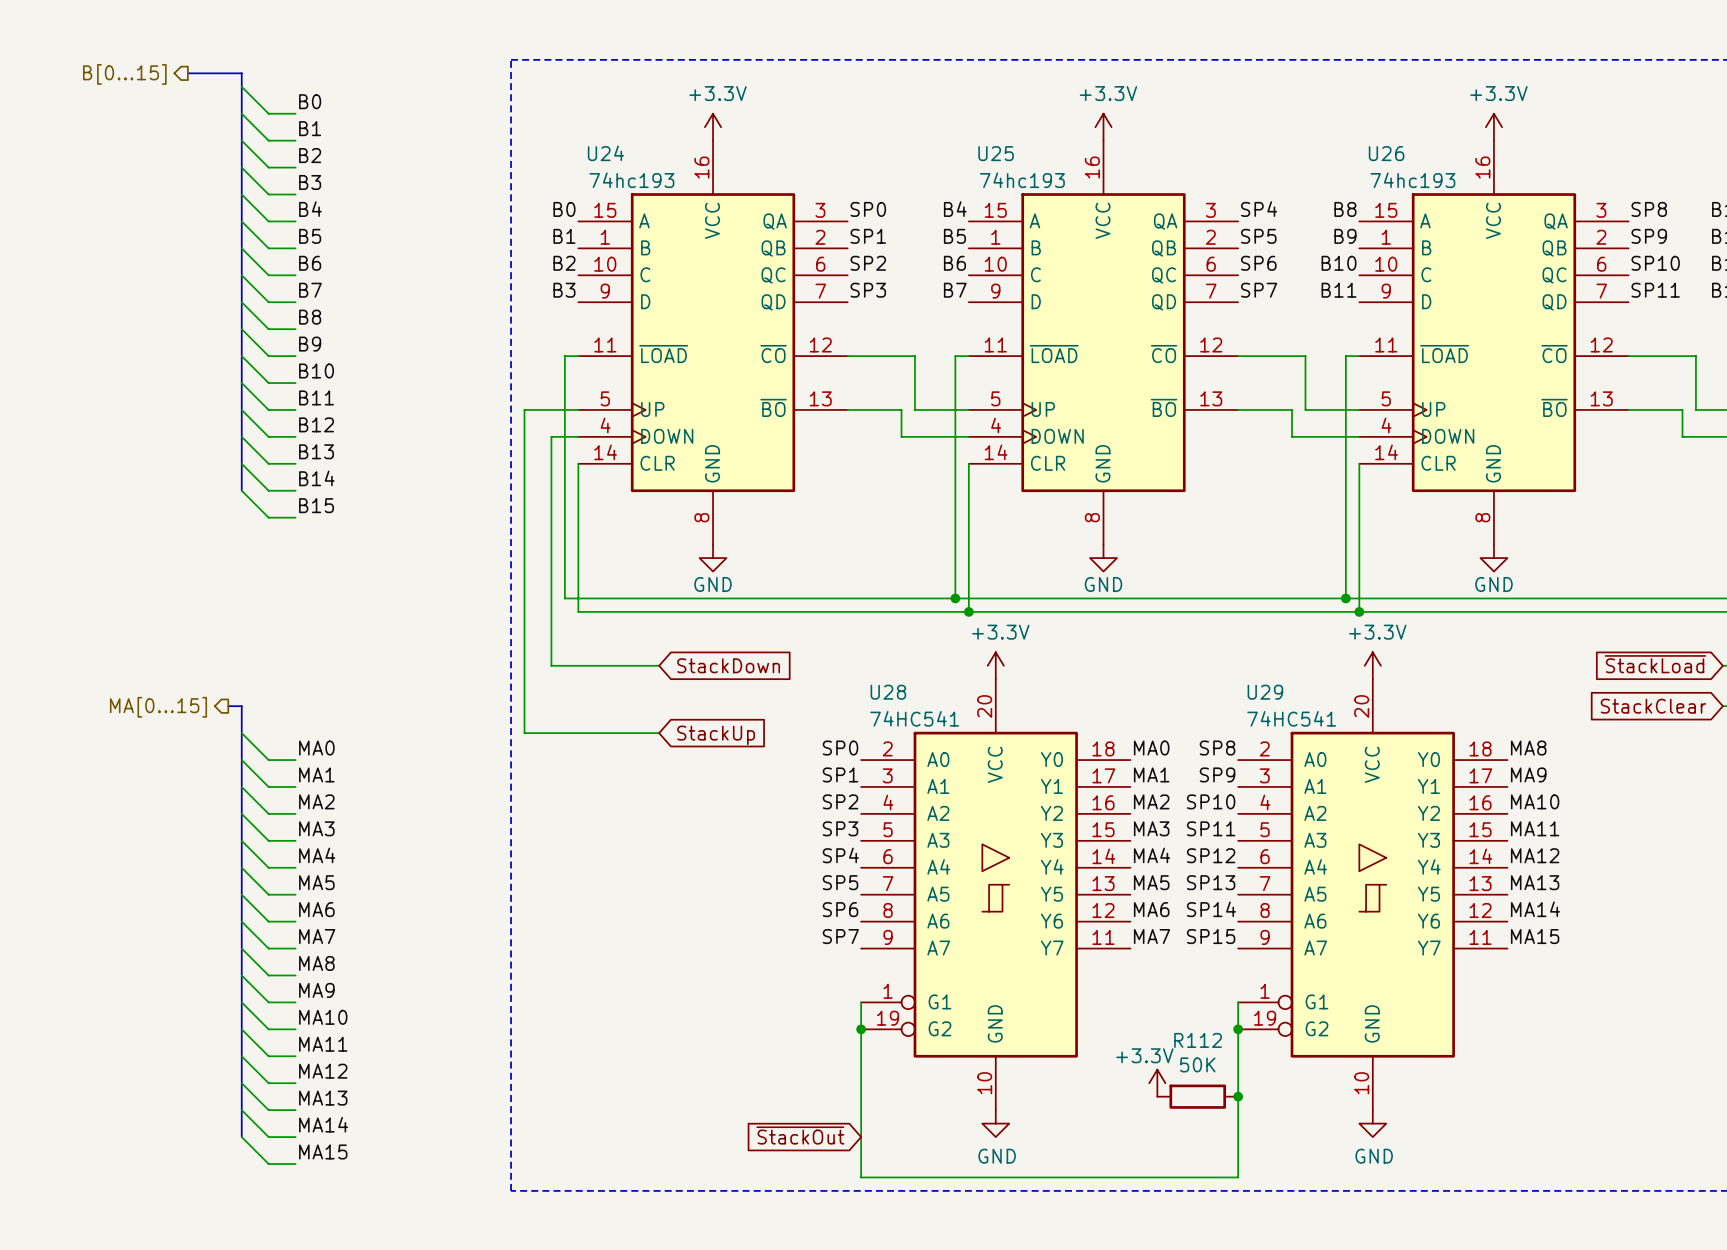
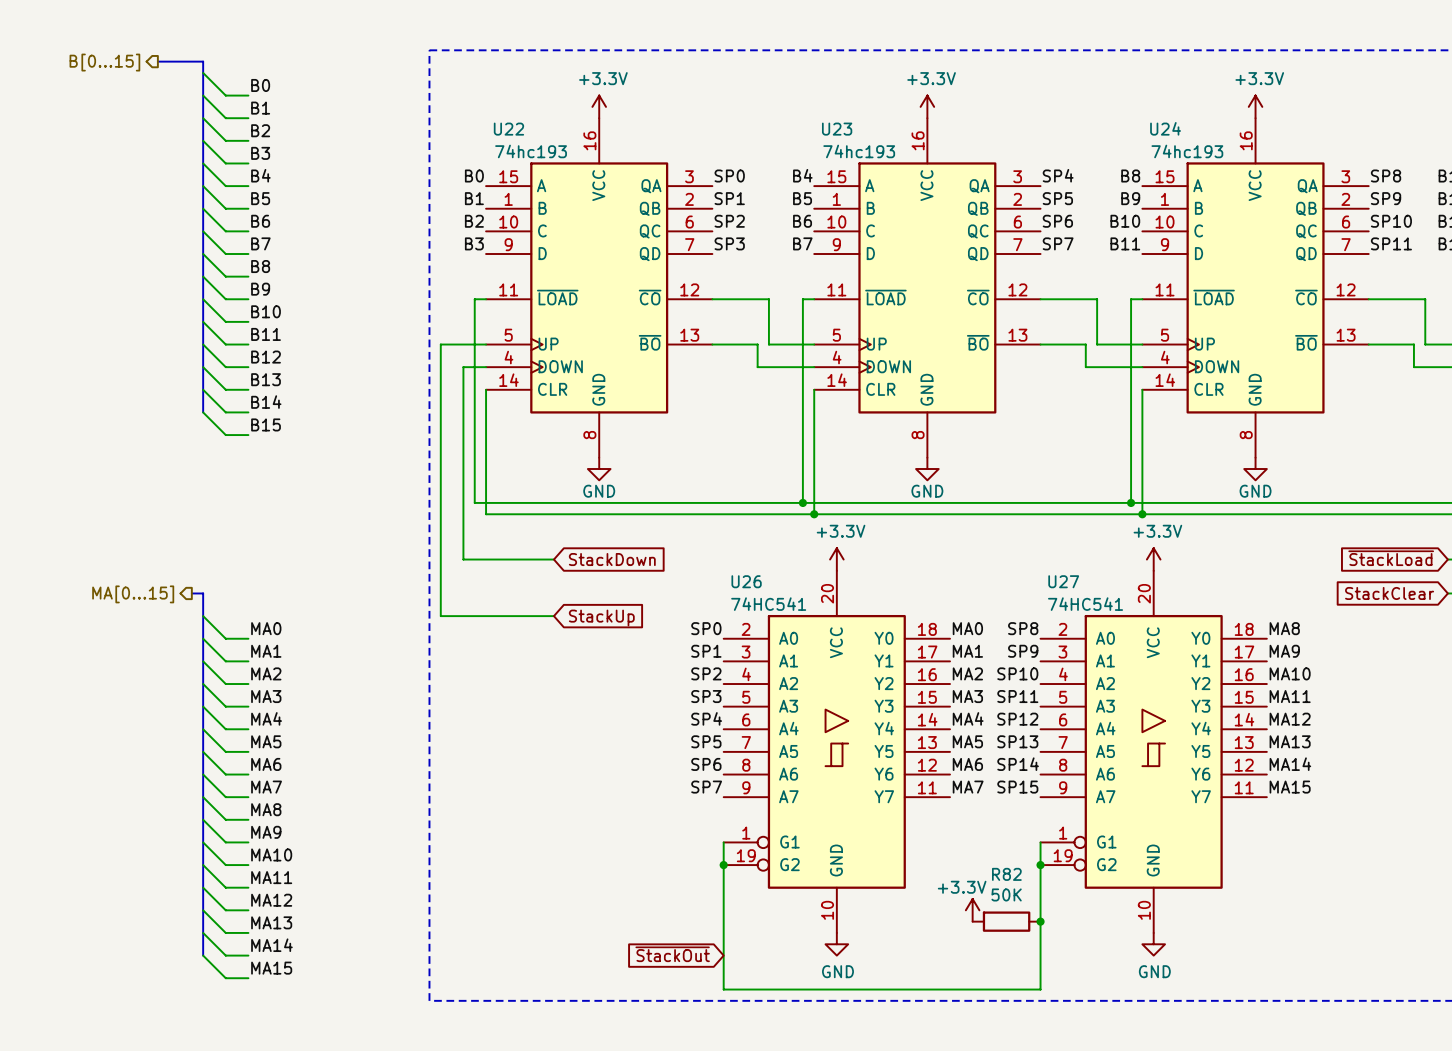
U24 name: U24 (605, 153) -> U22 (508, 129)
U25 name: U25 (996, 153) -> U23 (837, 129)
U26 name: U26 (1386, 153) -> U24 (1165, 128)
U28 name: U28 (888, 692) -> U26 (746, 581)
U29 name: U29 (1265, 692) -> U27 (1063, 581)
R112 name: R112 (1198, 1040) -> R82 (1006, 874)

